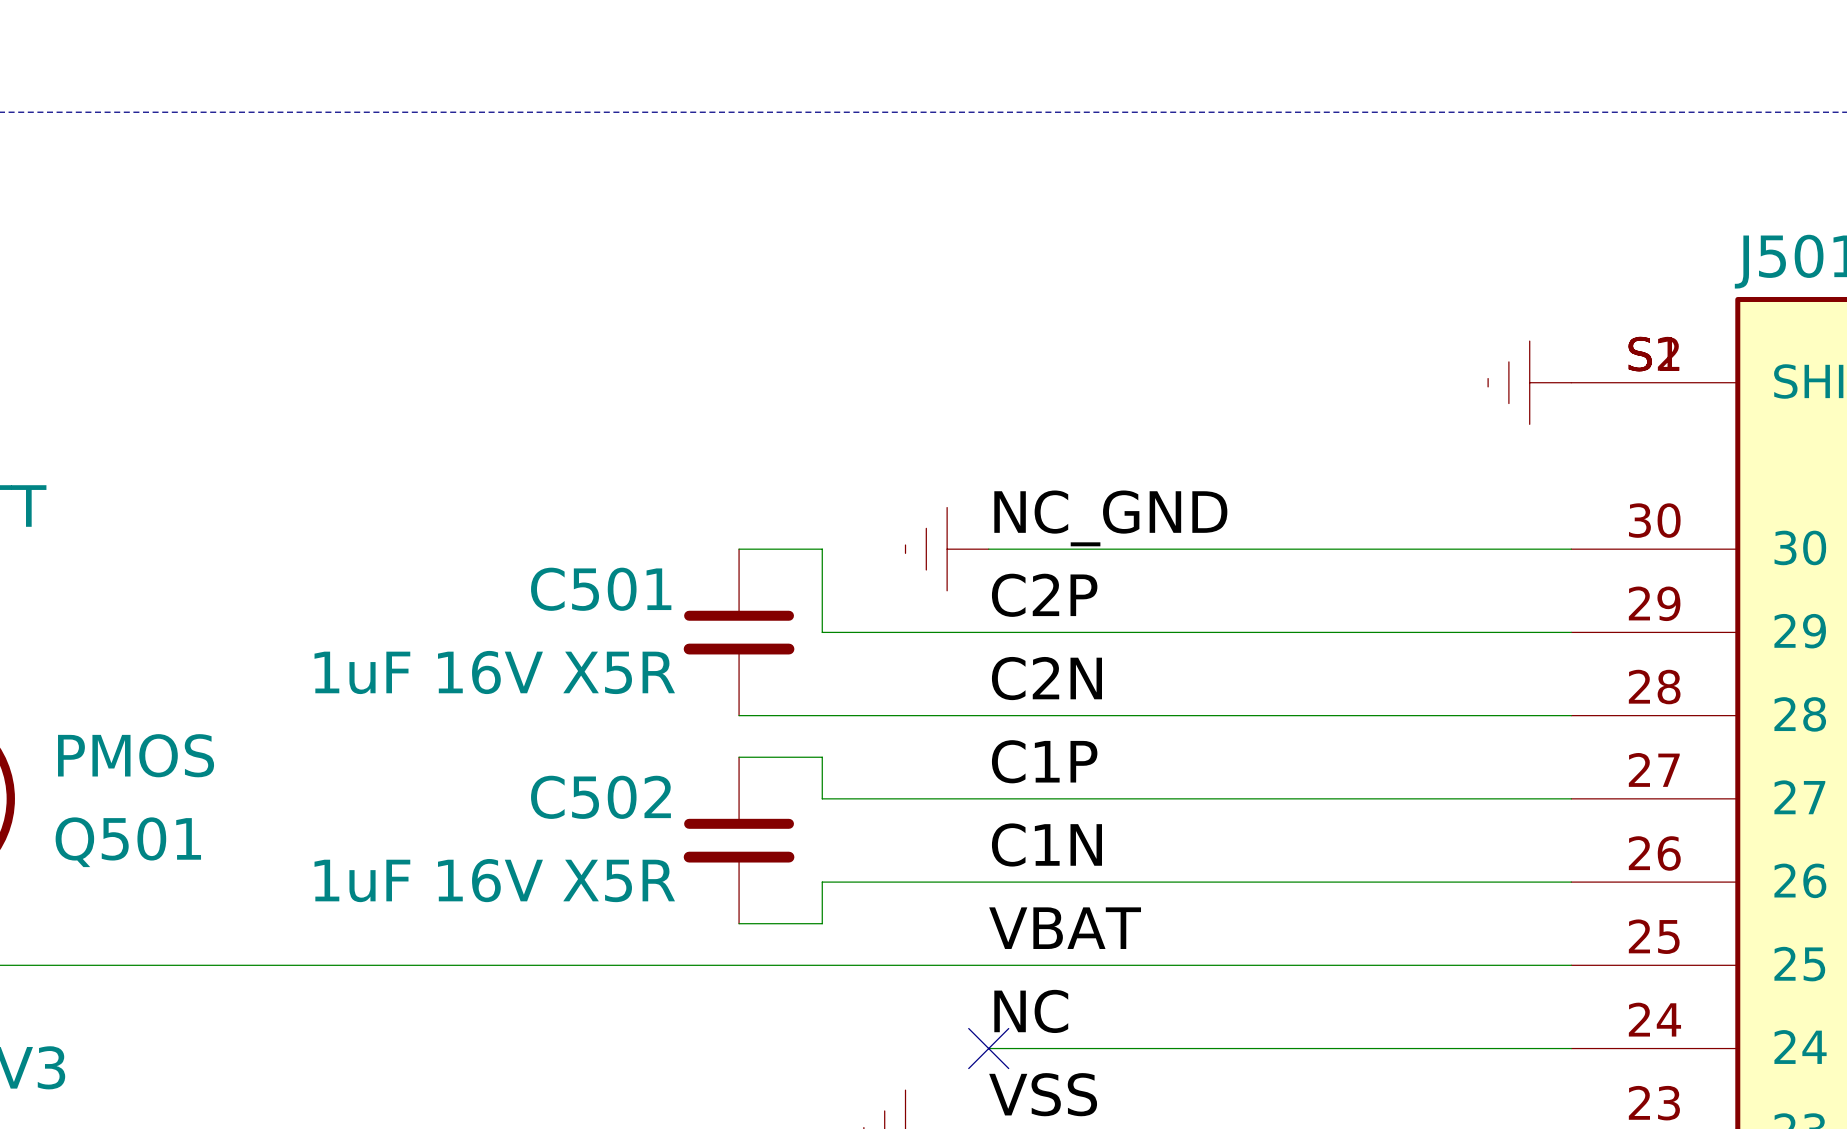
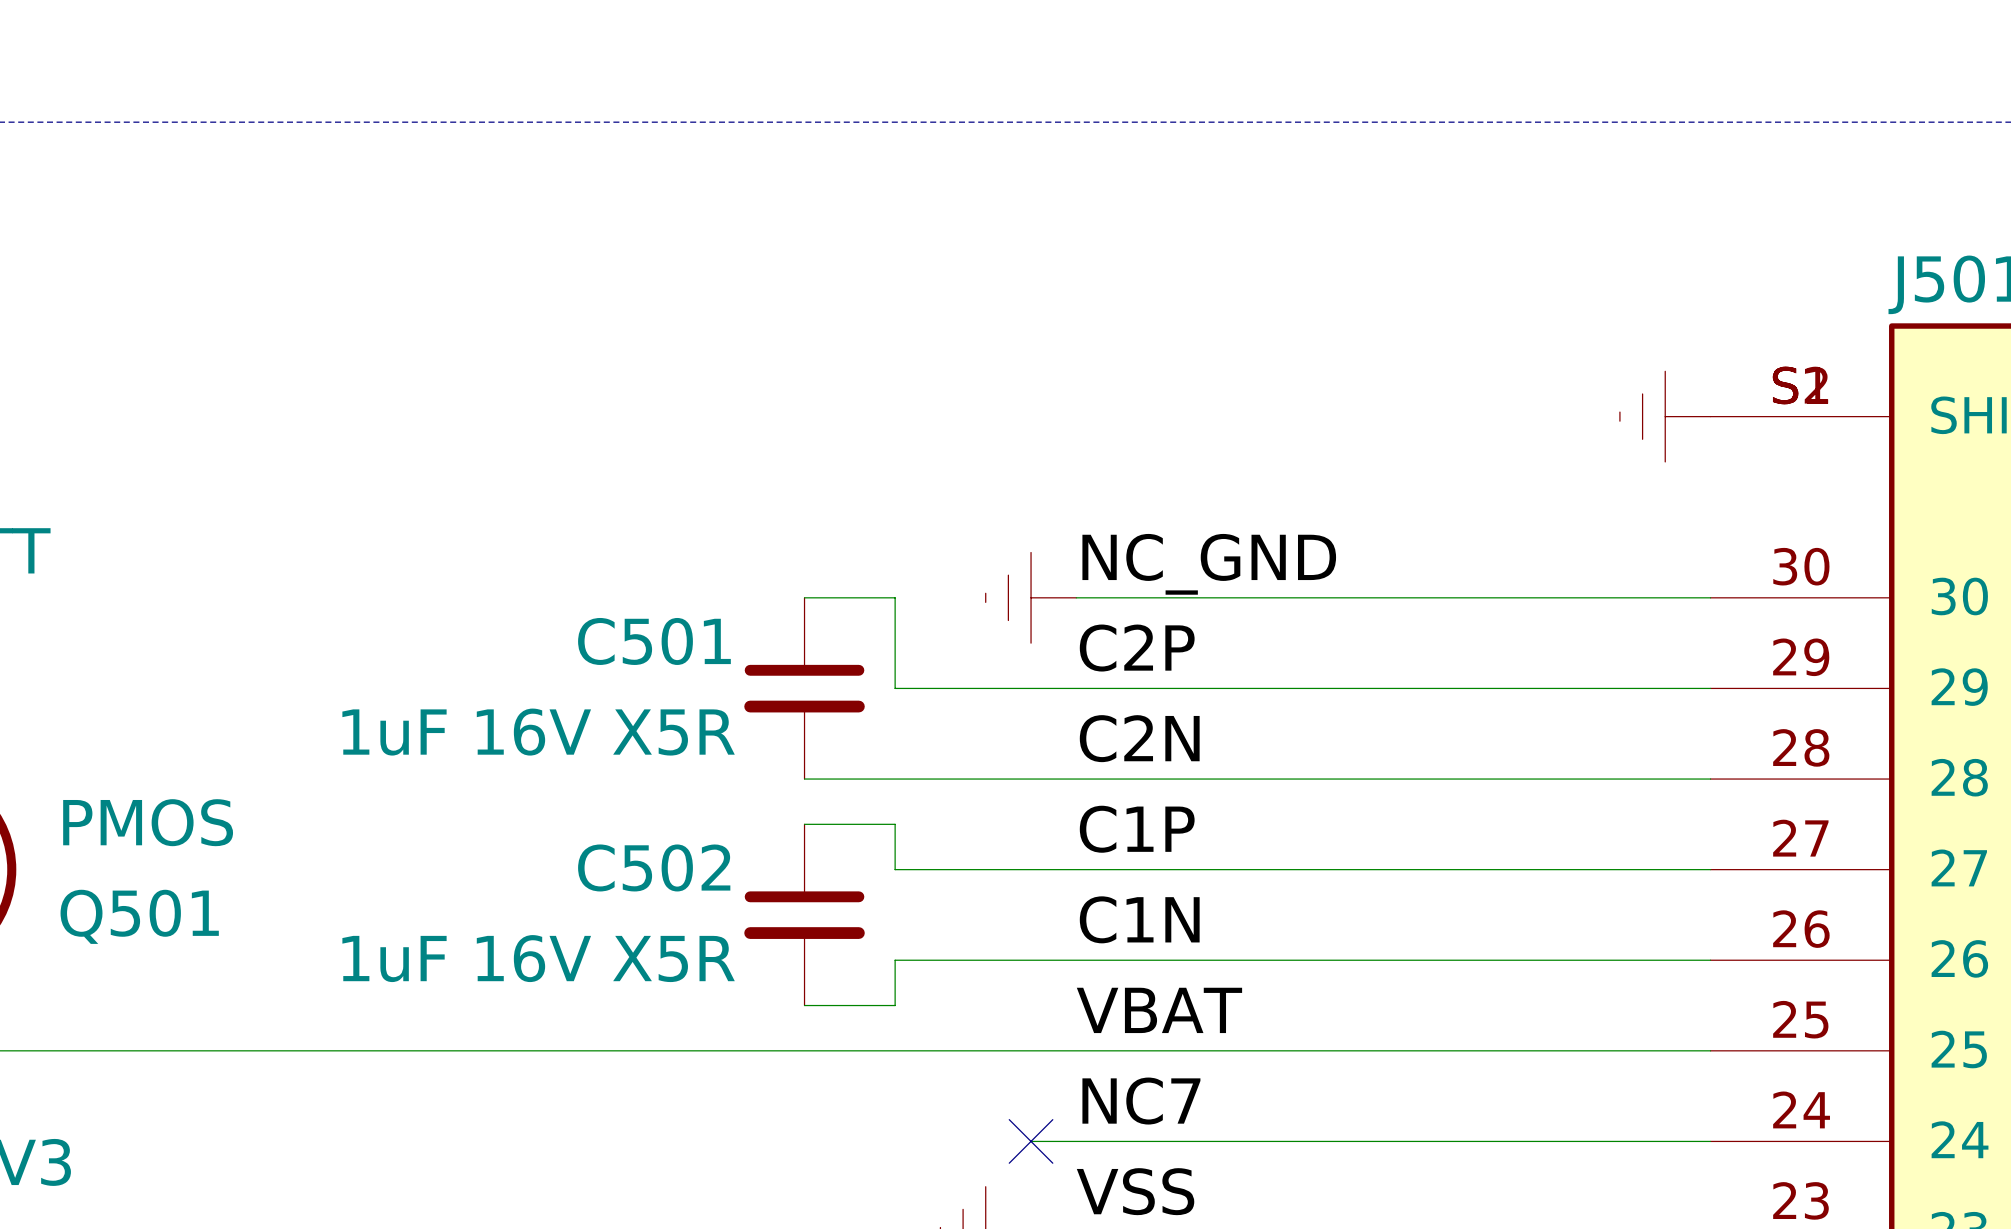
label: NC (1031, 1011) -> NC7 (1141, 1101)
wire: none -> (1031, 1141) (1076, 1141)
no-connect mark position: (988, 1048) -> (1031, 1141)

